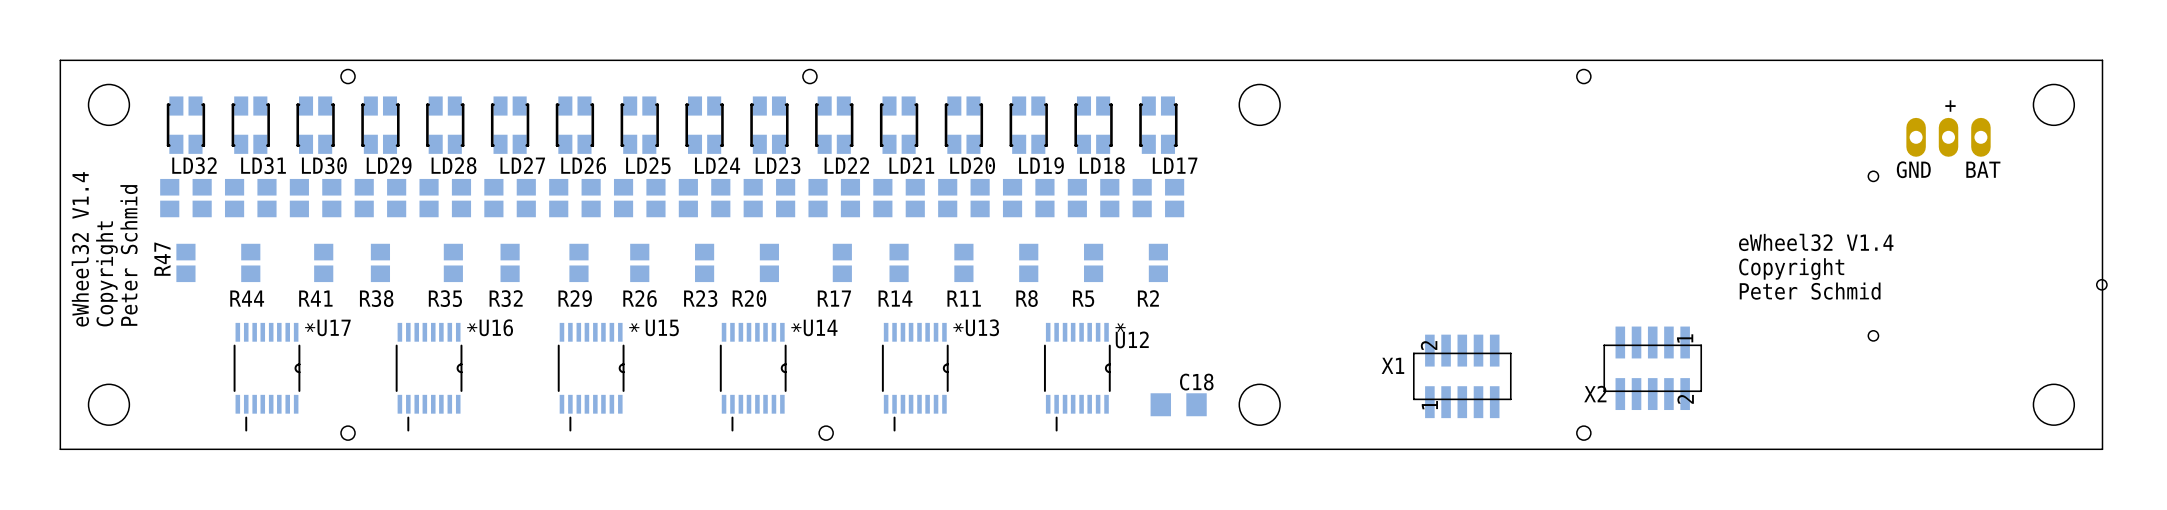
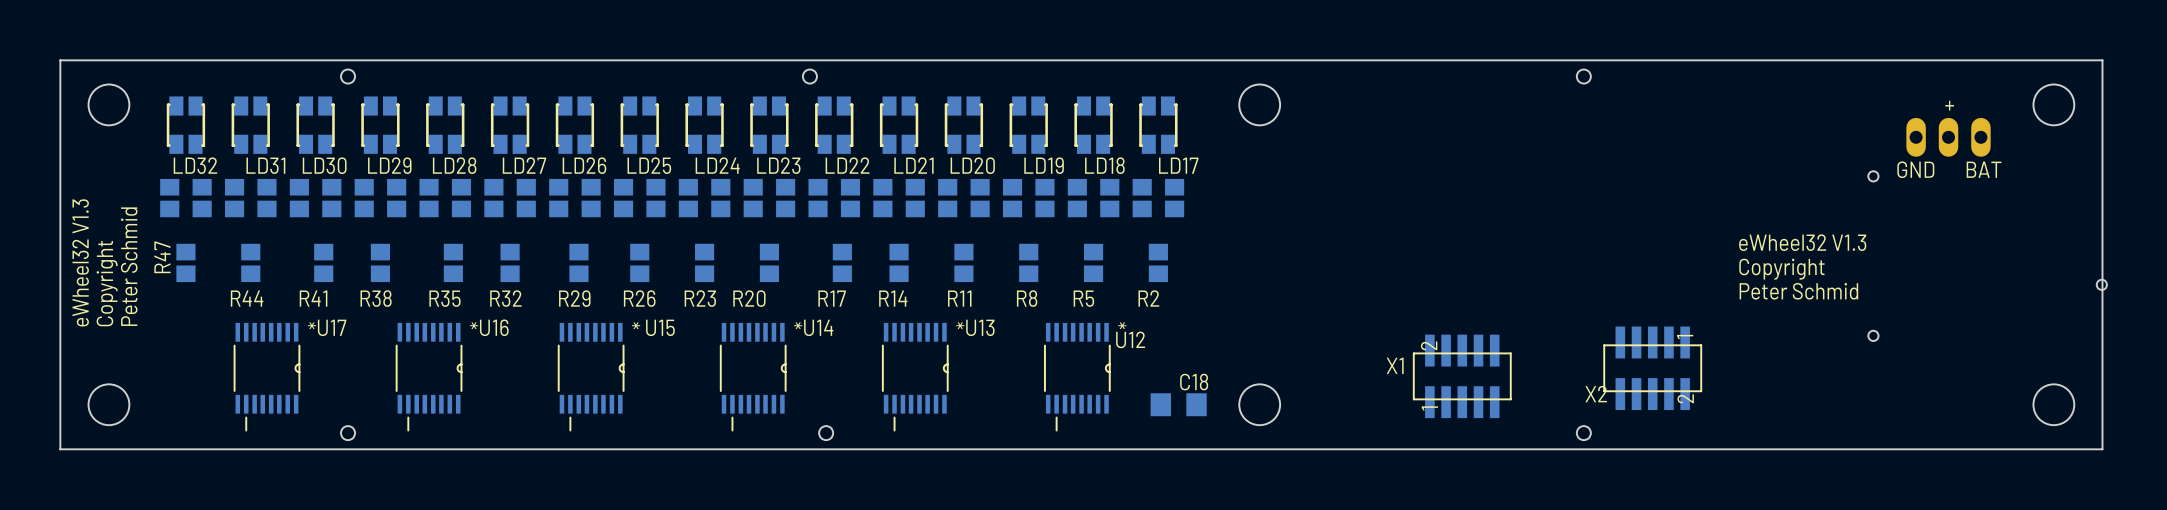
text: eWheel32 V1.4 (1816, 242) -> eWheel32 V1.3 (1802, 242)
text: eWheel32 V1.4 (80, 249) -> eWheel32 V1.3 (80, 262)

